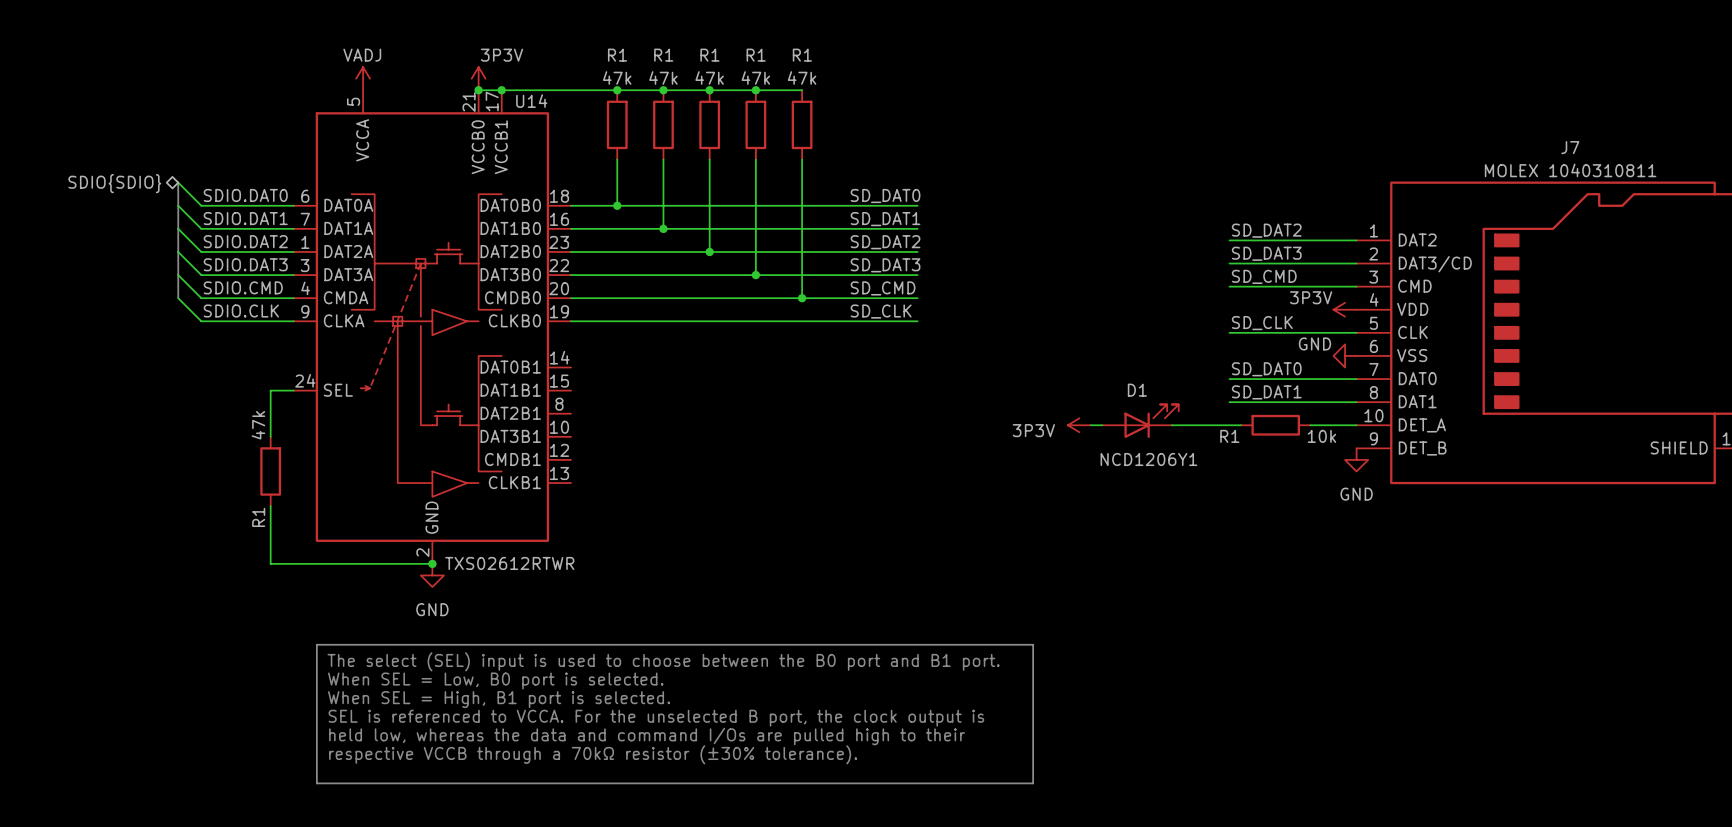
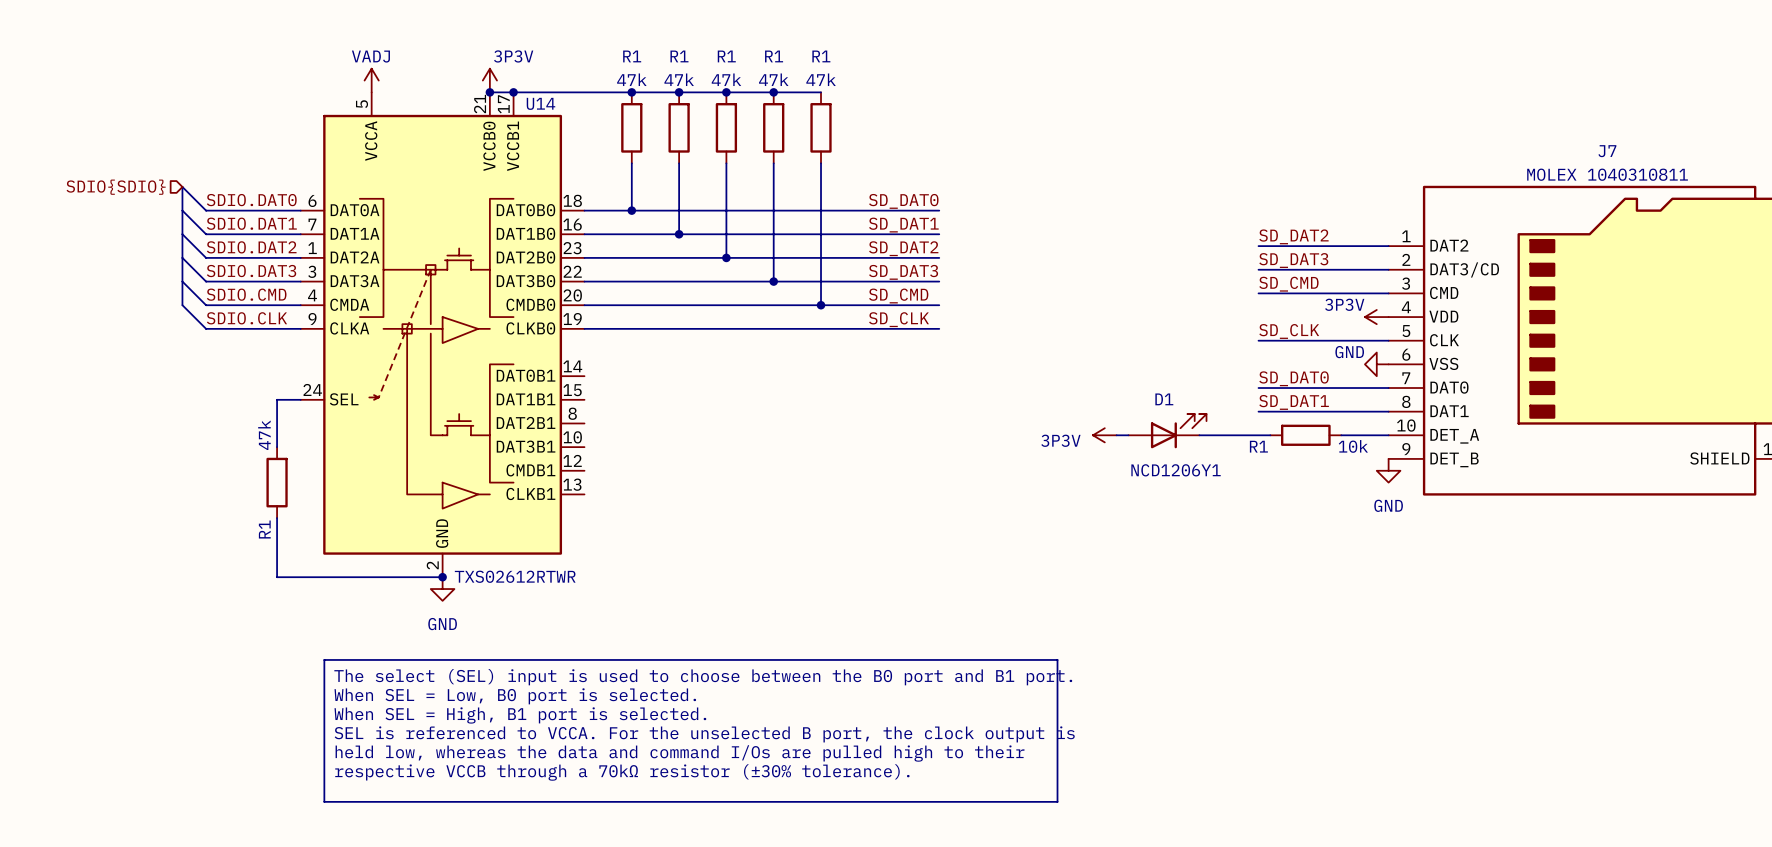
hierarchical label shape: bidirectional (114, 183) -> input (116, 187)

